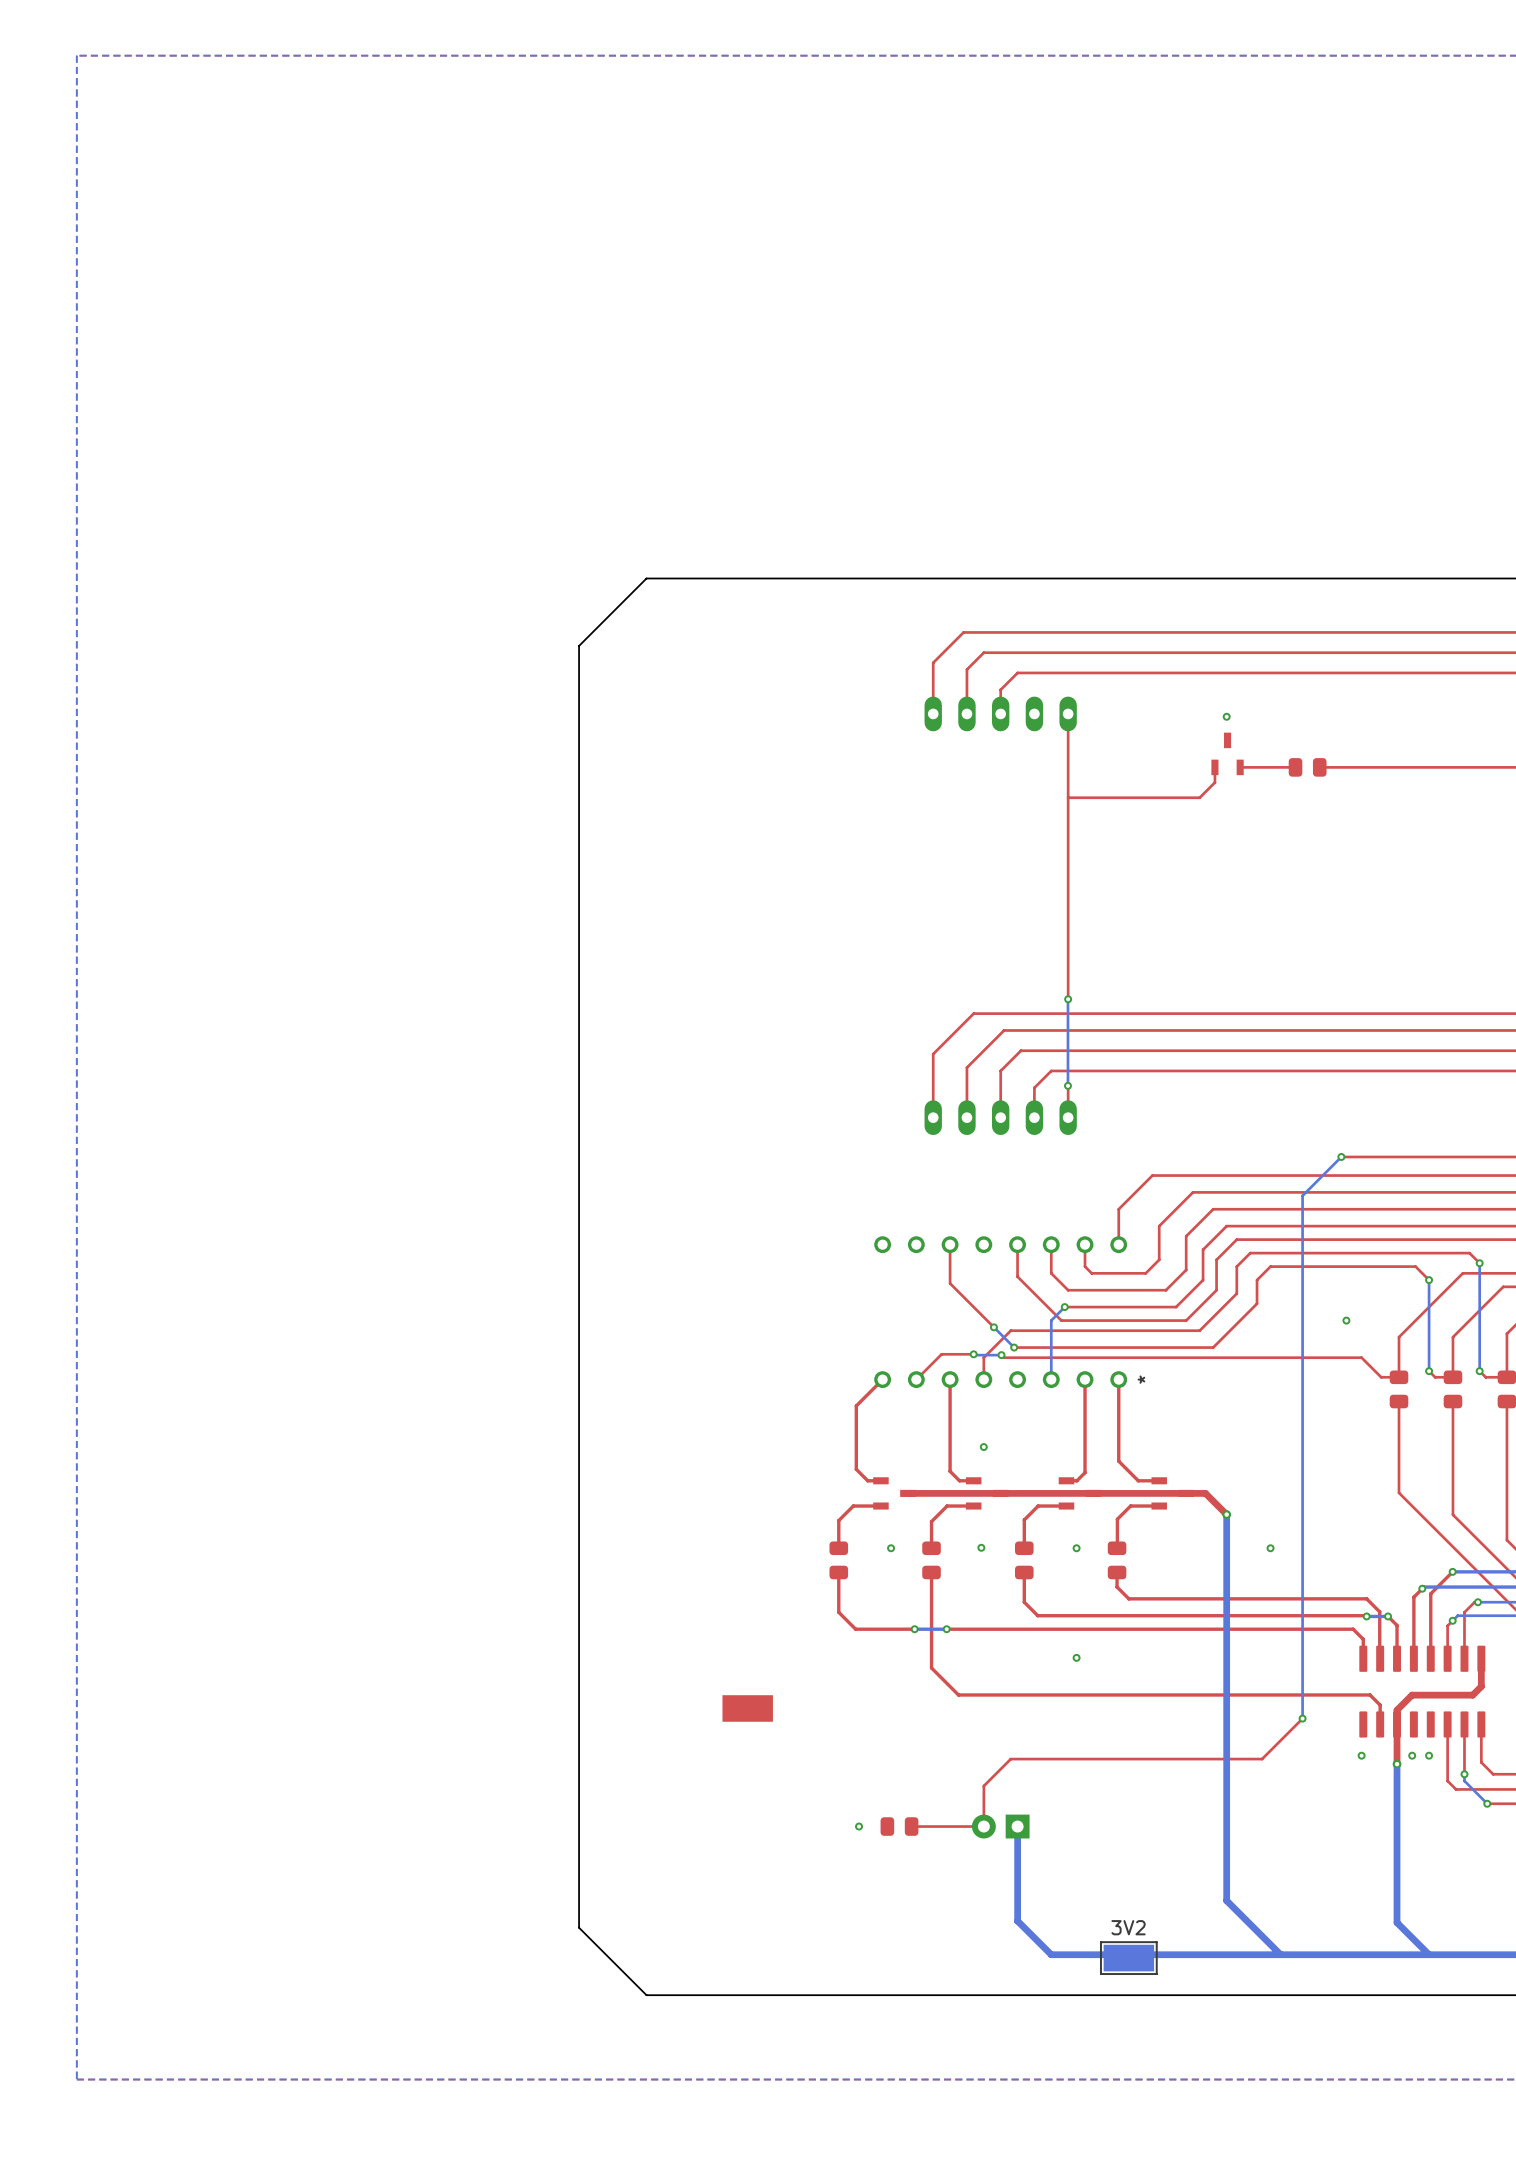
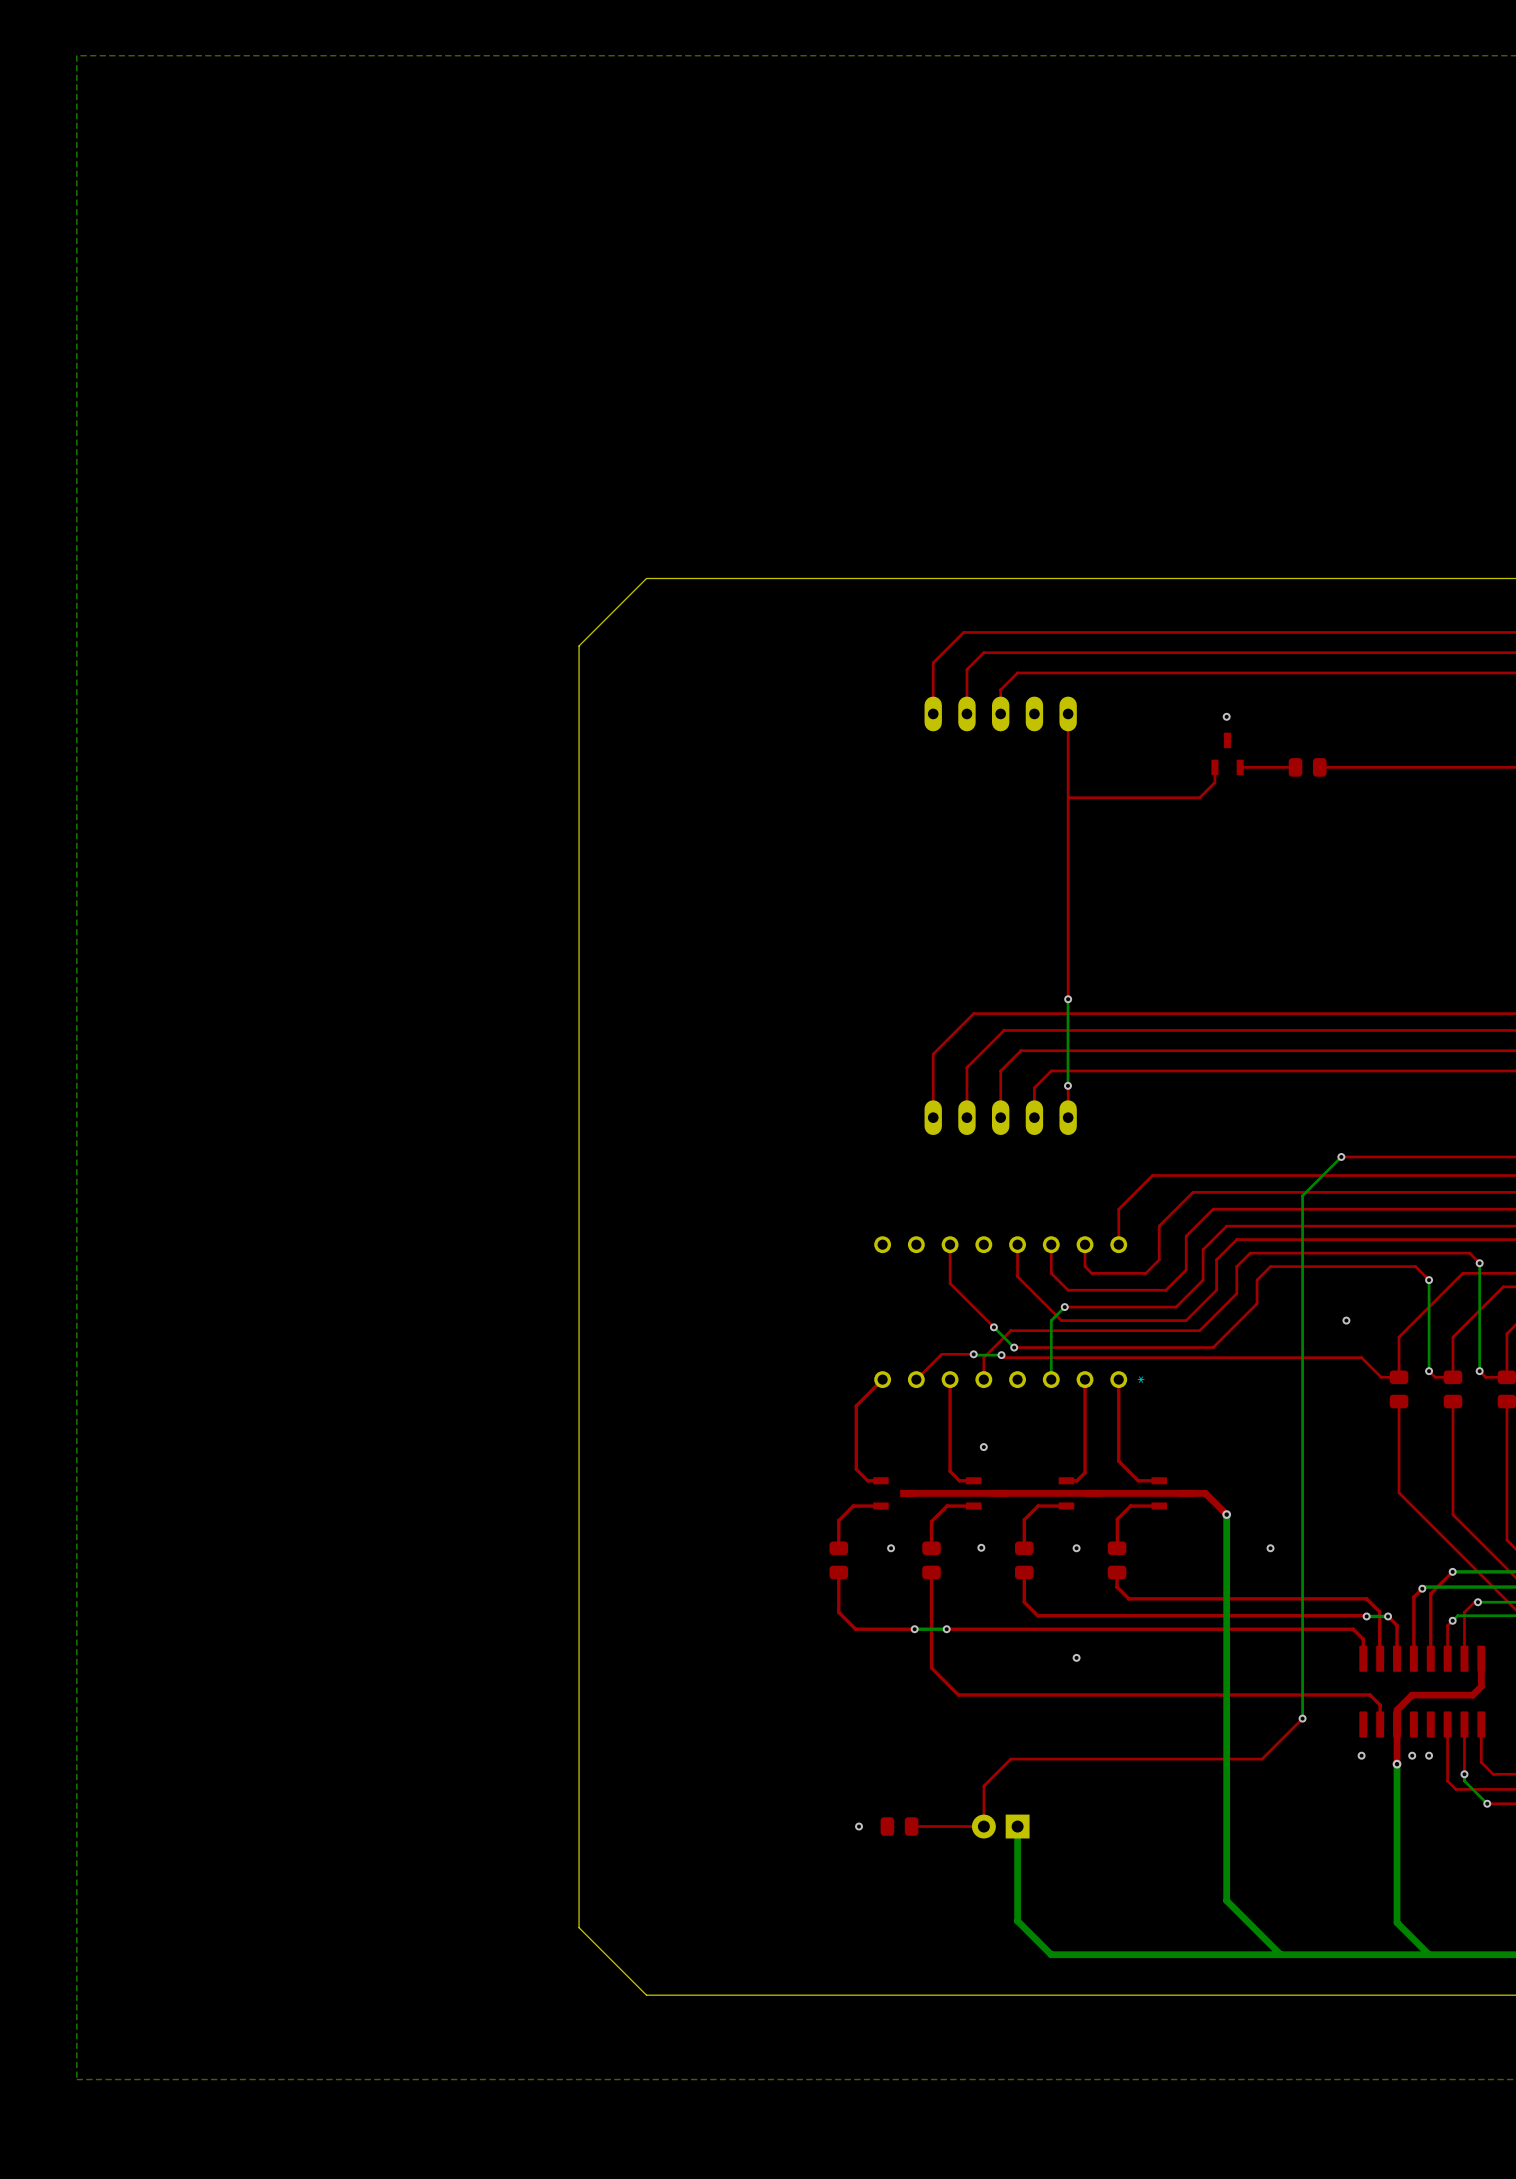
part: (747, 1708) -> none
3V2: (1128, 1958) -> none

